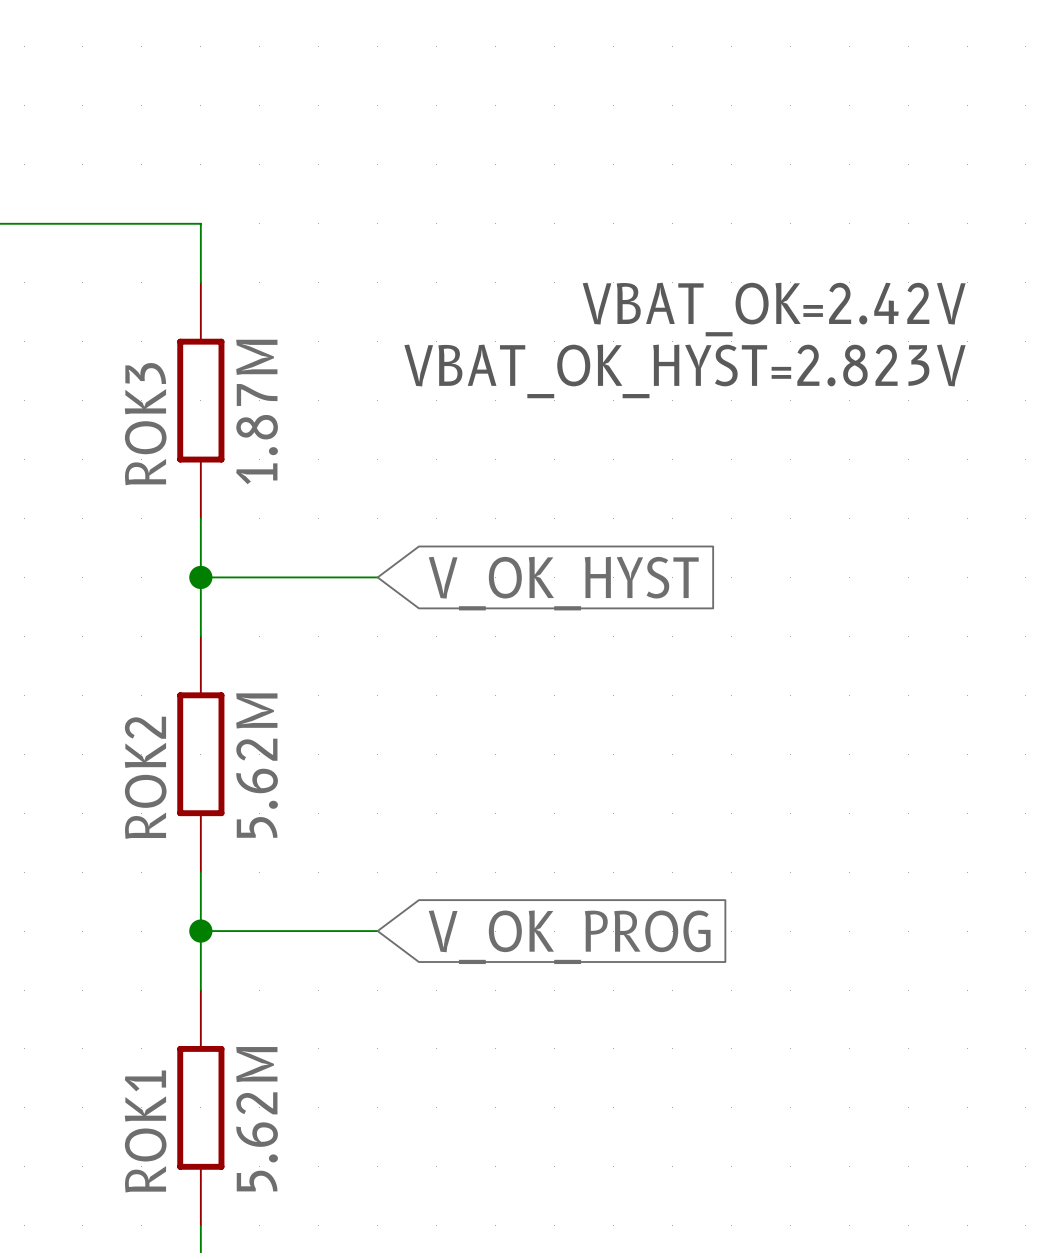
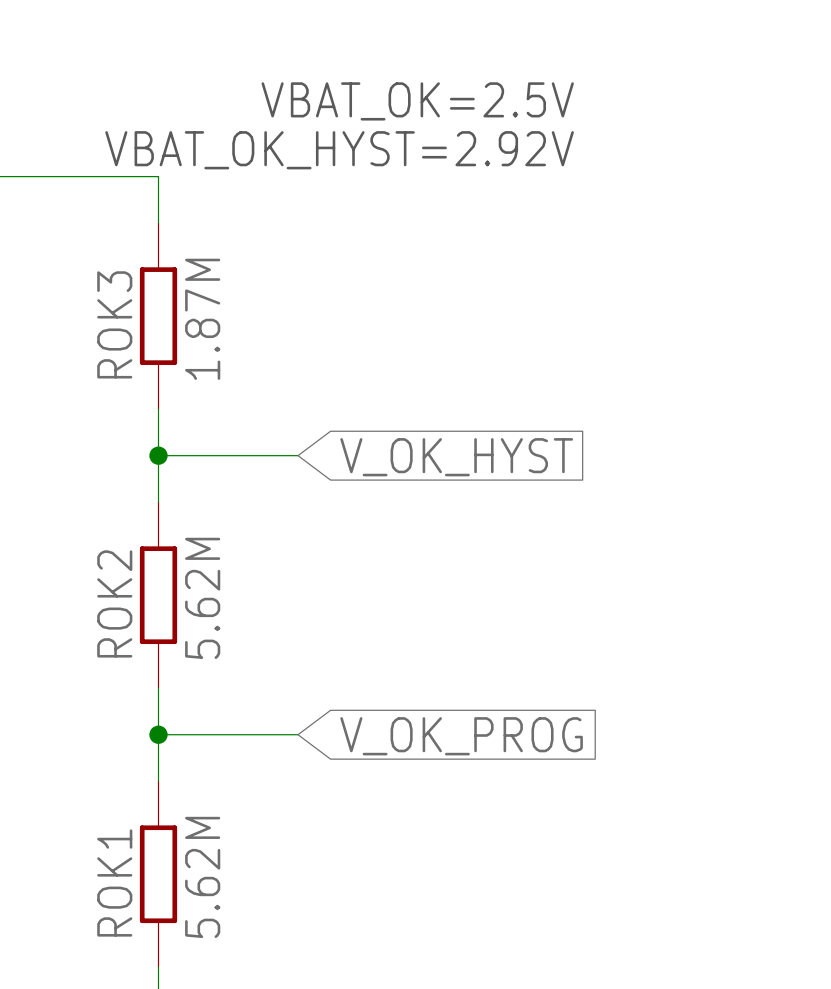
text: none -> VBAT_OK=2.5V (417, 101)
text: none -> VBAT_OK_HYST=2.92V (339, 150)
text: VBAT_OK=2.42V (774, 309) -> none
text: VBAT_OK_HYST=2.823V (684, 371) -> none

